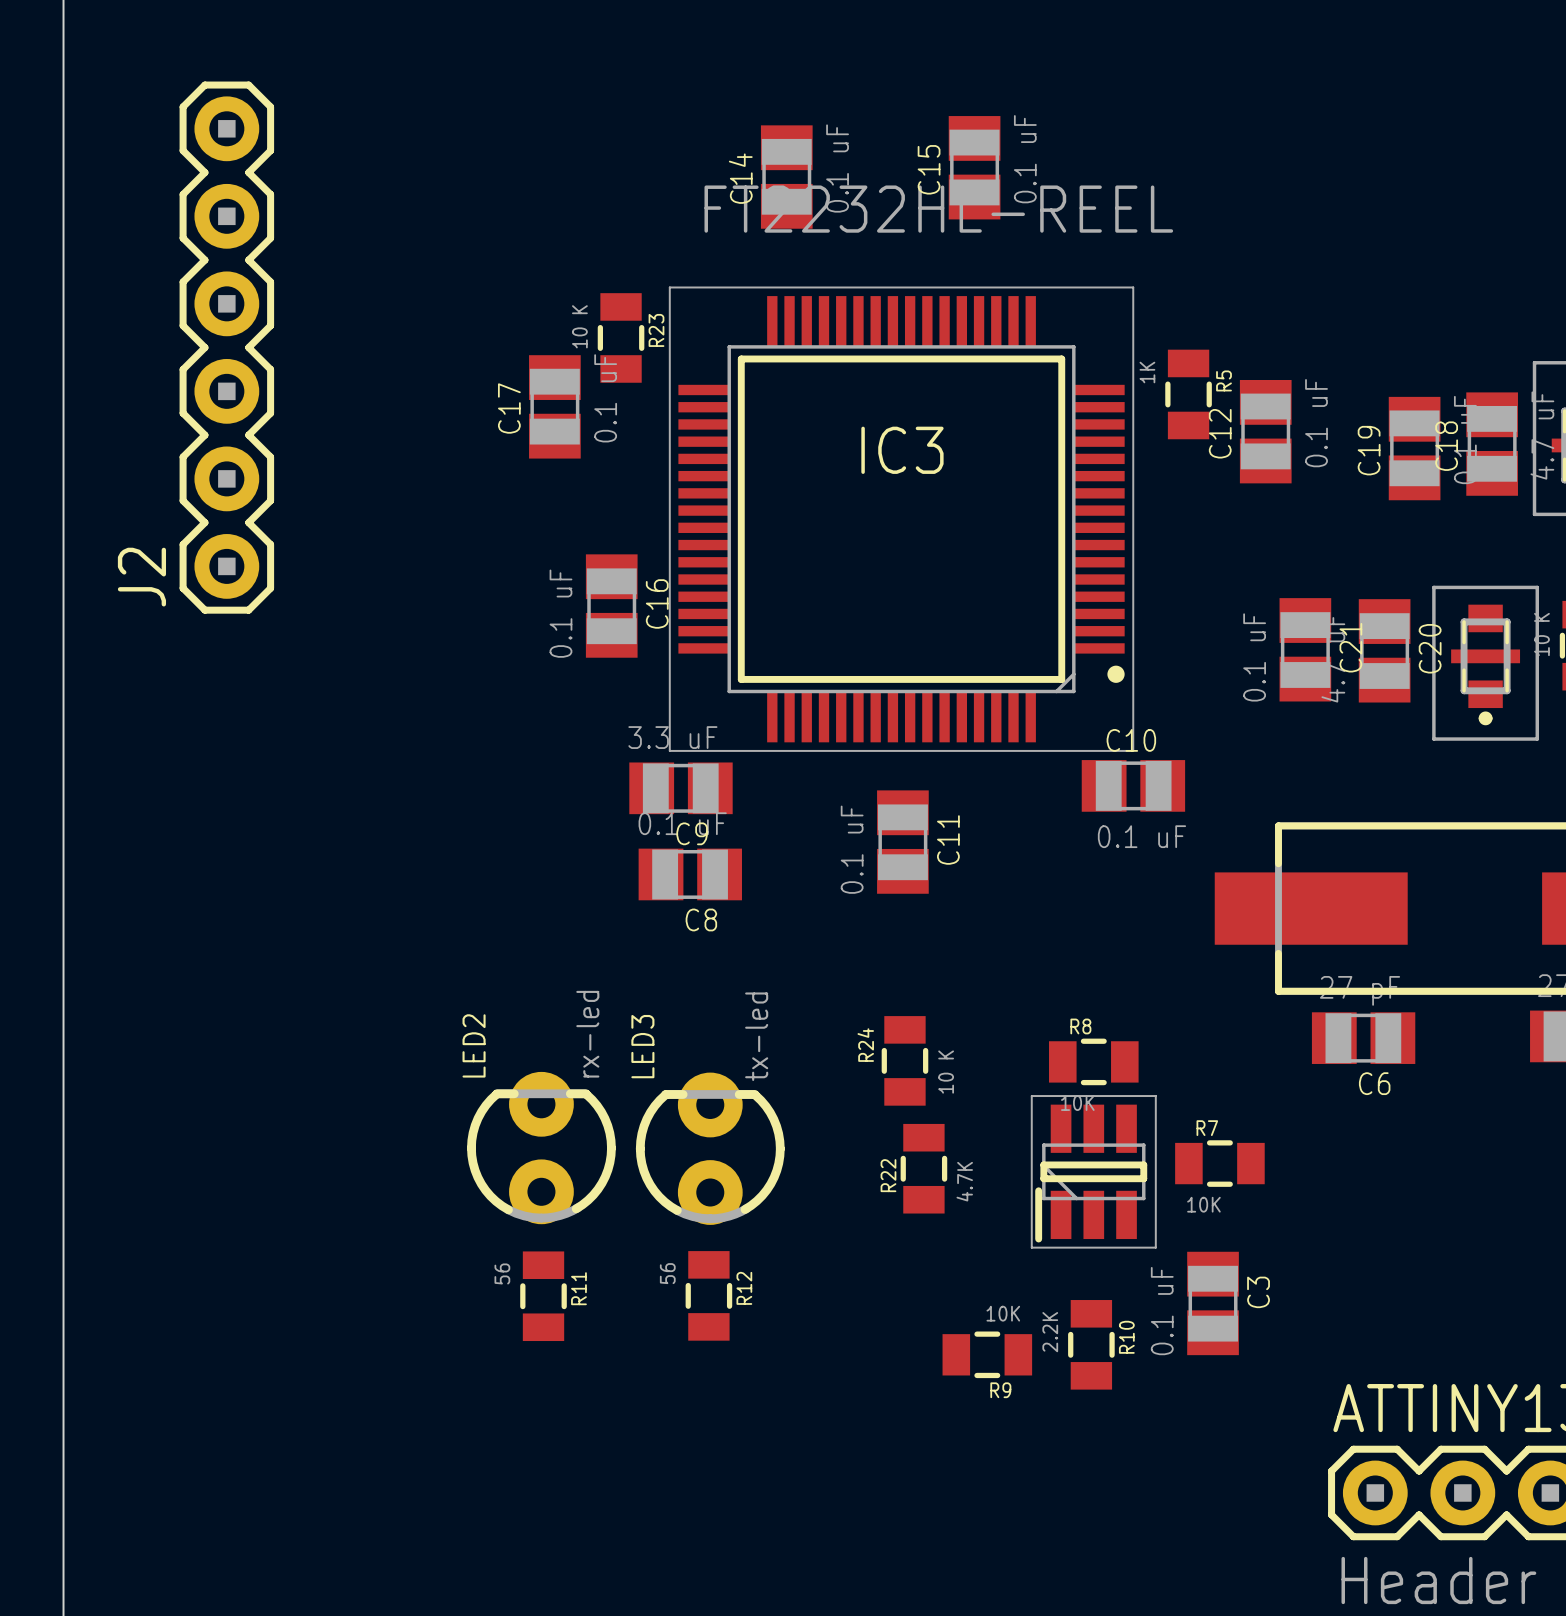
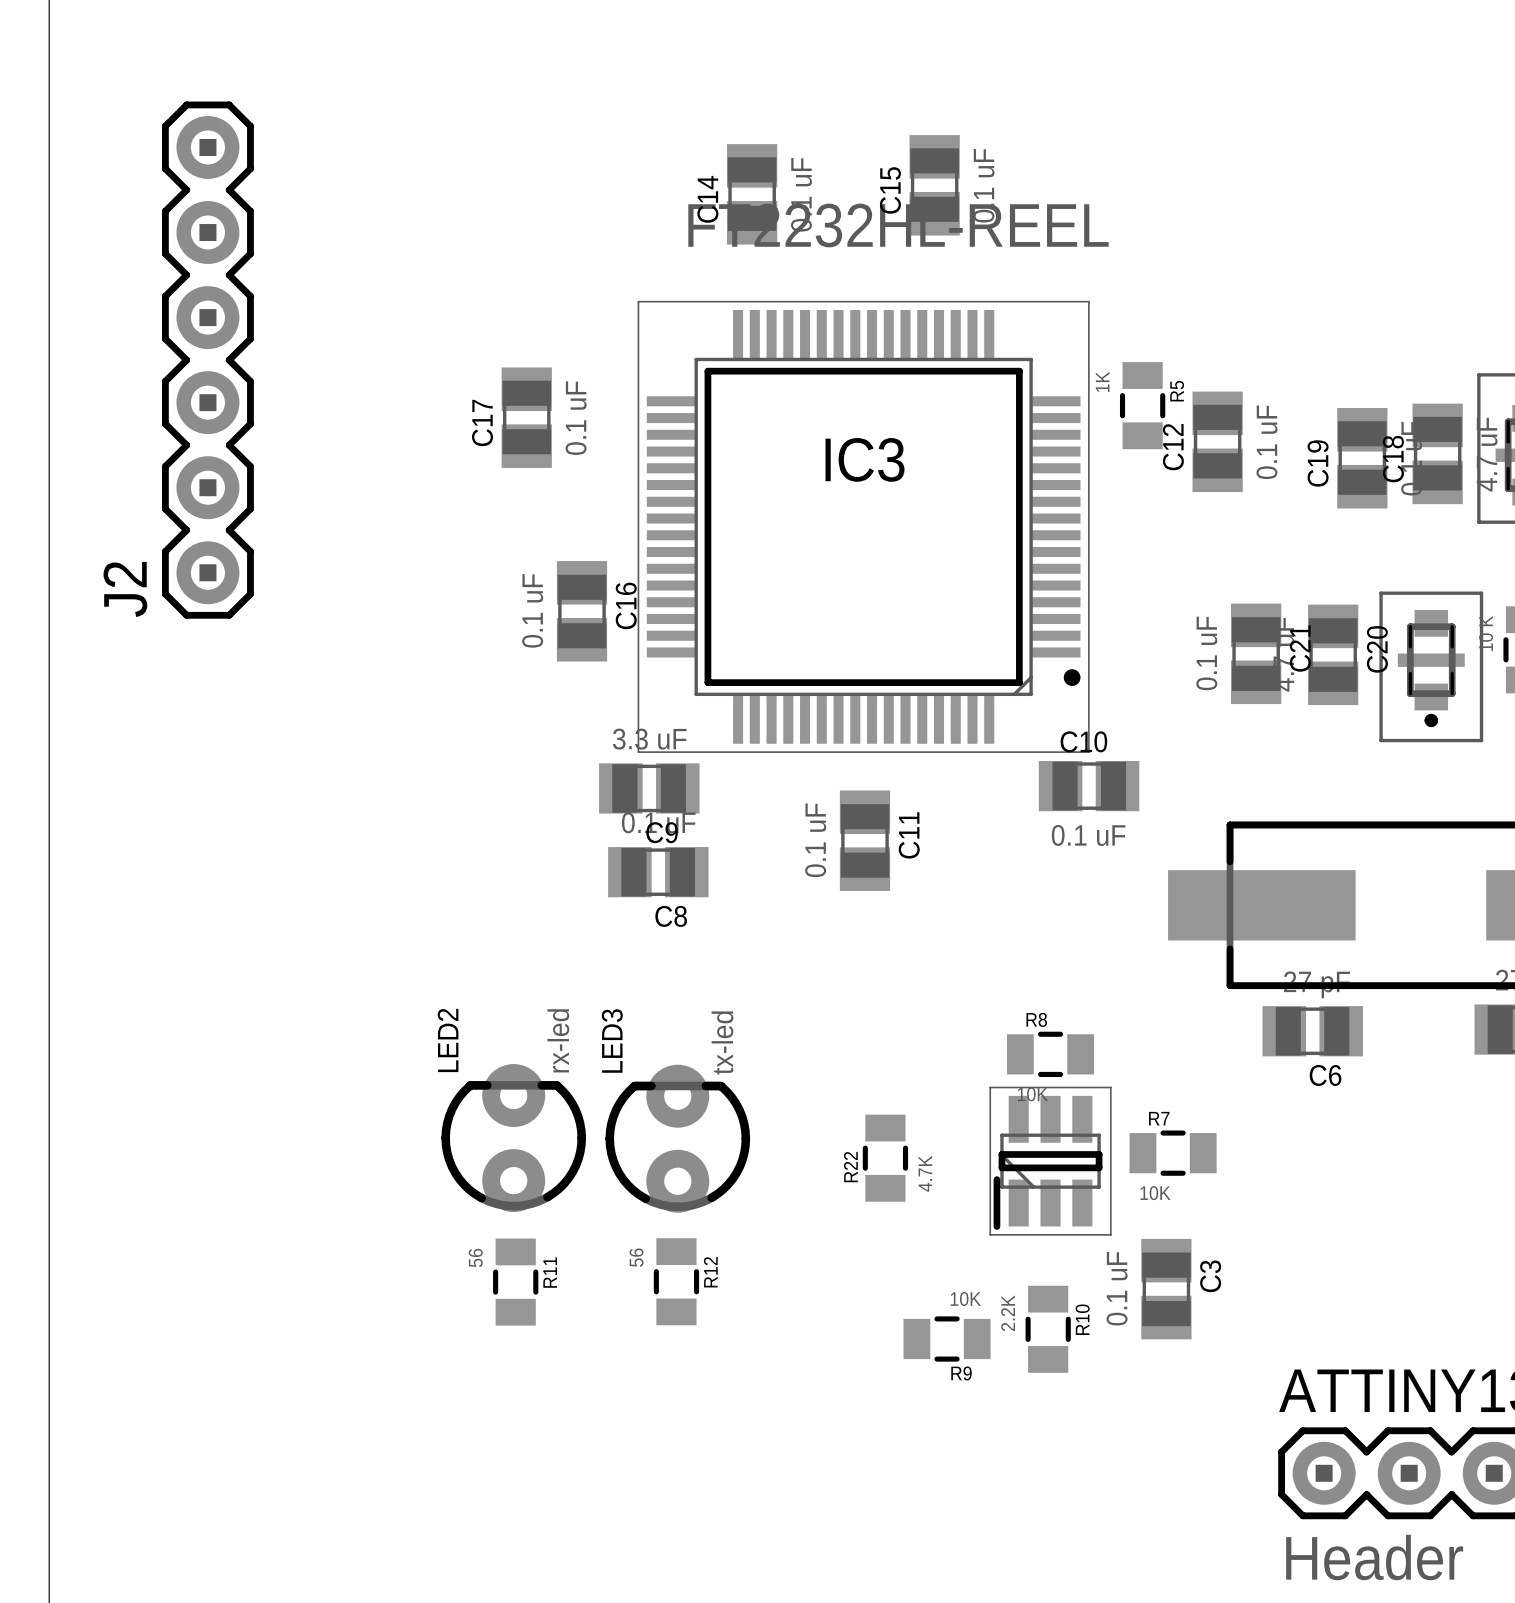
R23: 10 K (621, 337) -> none
R24: 10 K (904, 1060) -> none

